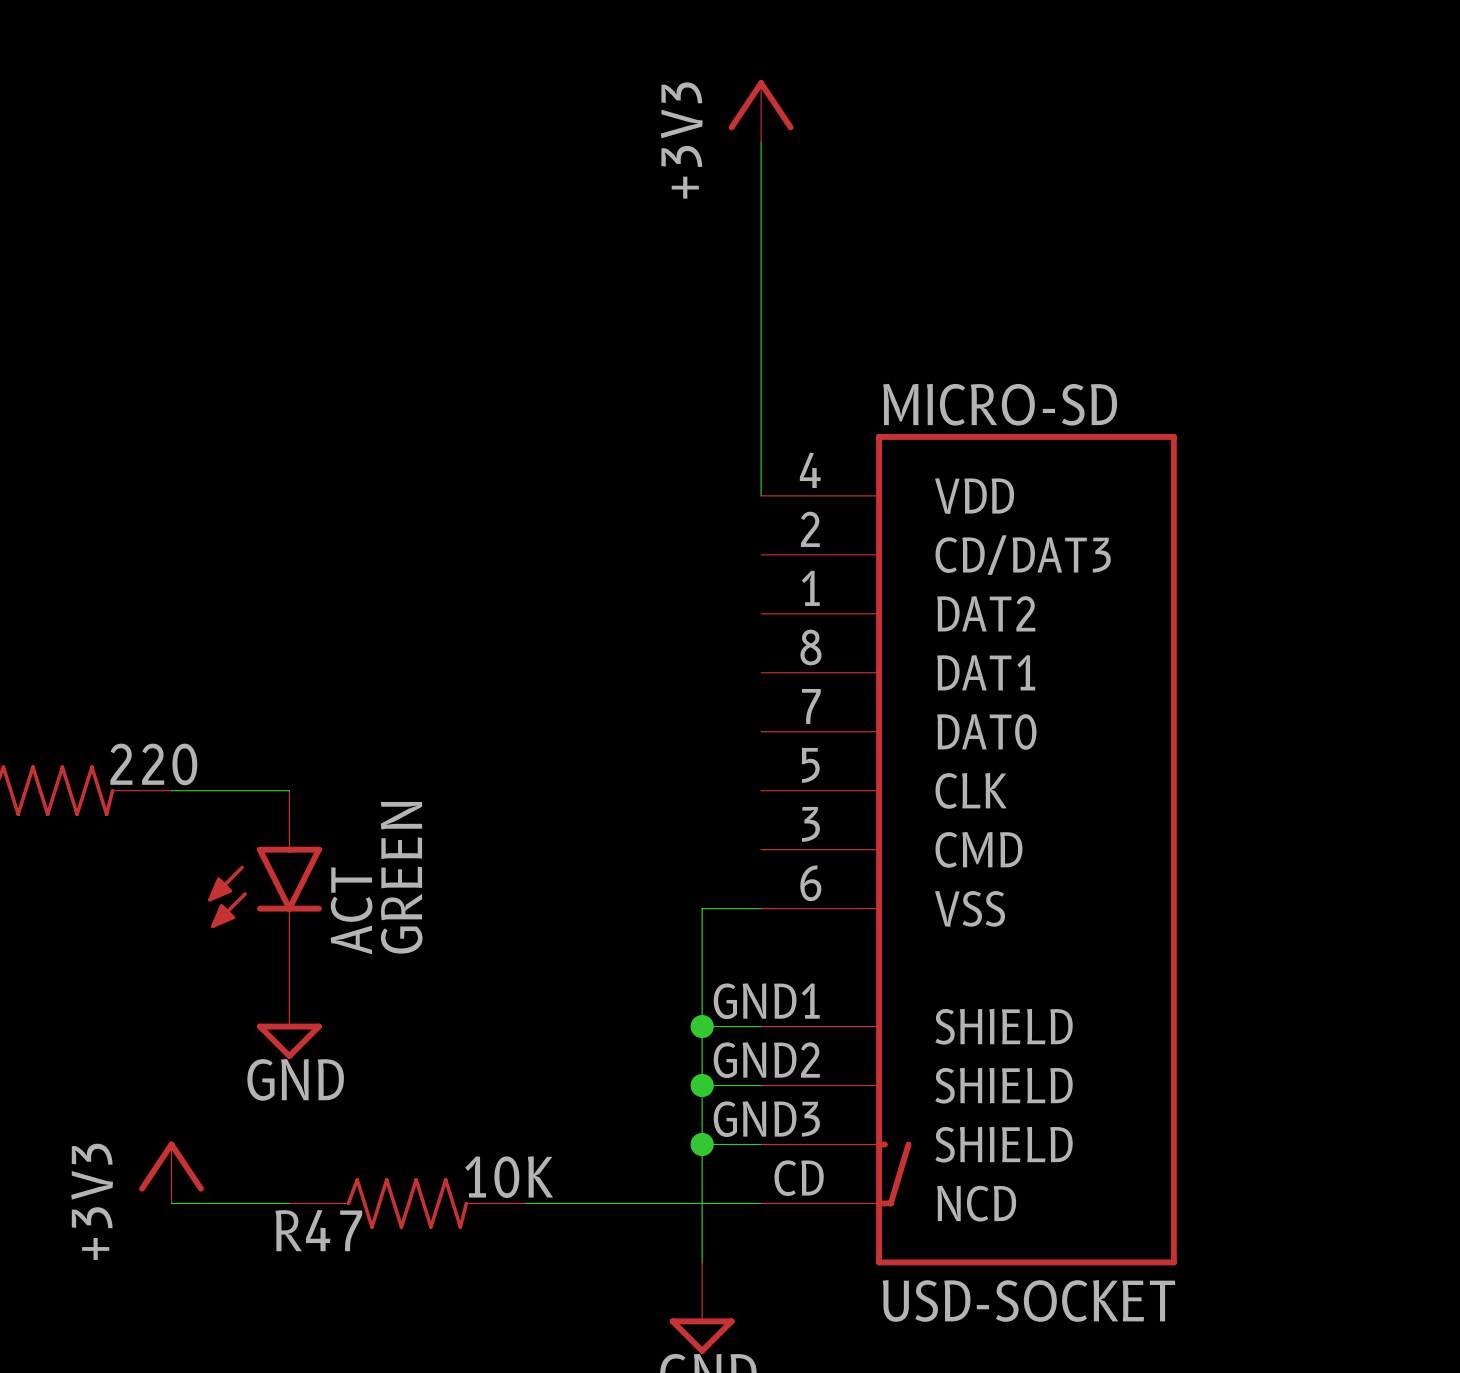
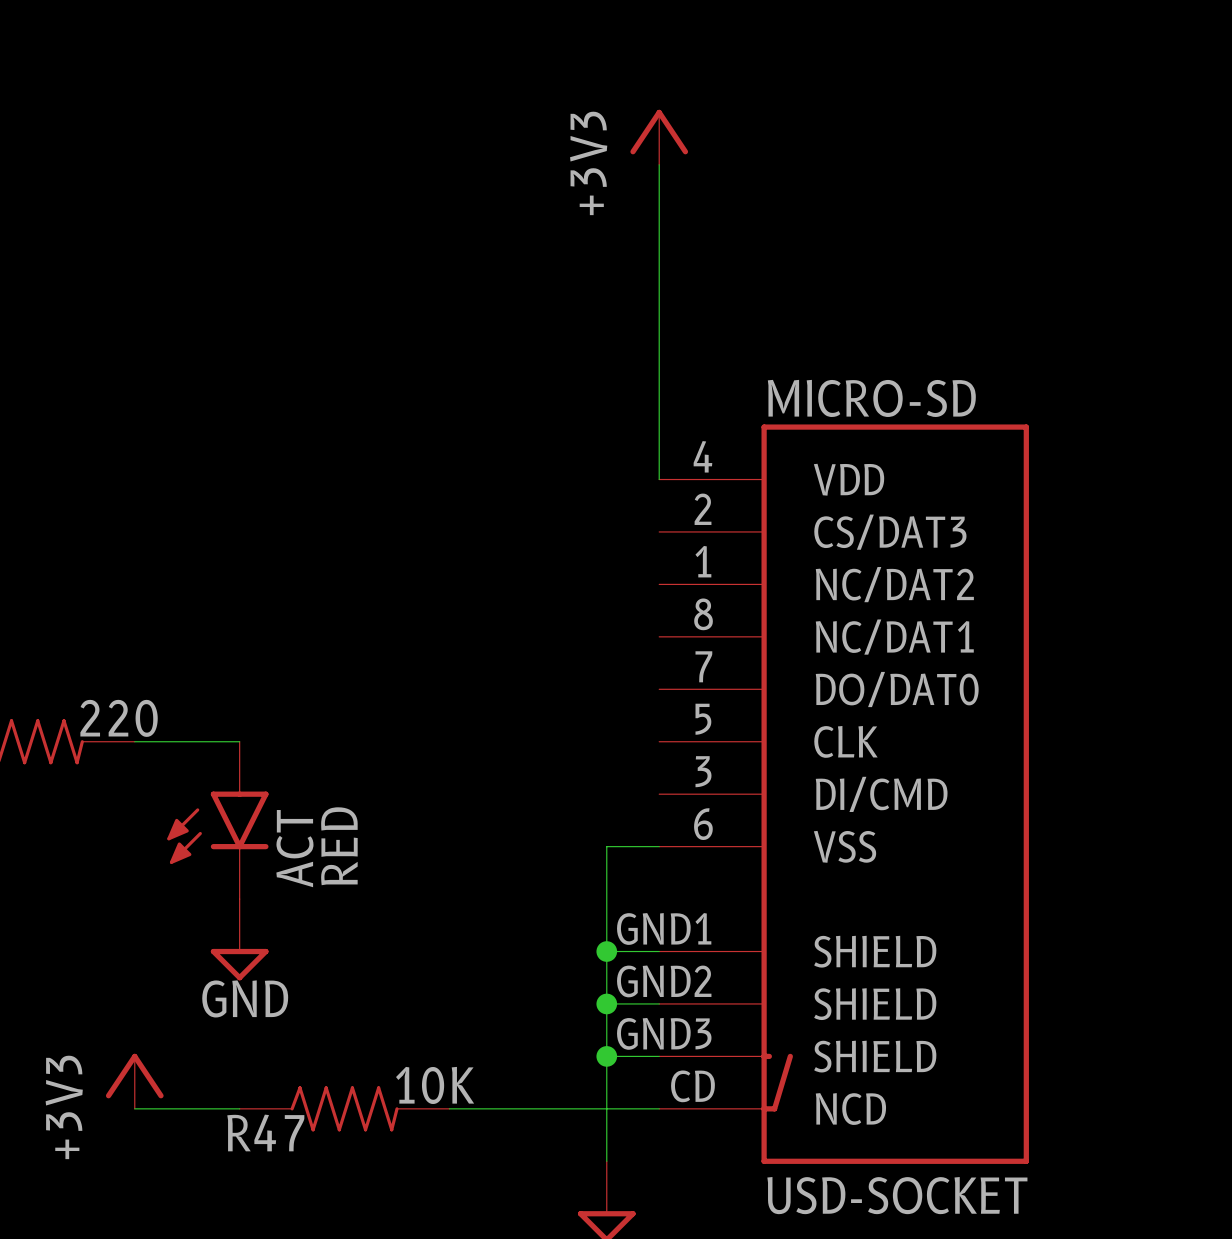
MICRO-SD pin name: CD/DAT3 (1023, 555) -> CS/DAT3 (890, 532)
MICRO-SD pin name: DAT2 (986, 613) -> NC/DAT2 (894, 584)
MICRO-SD pin name: DAT1 (986, 672) -> NC/DAT1 (894, 637)
MICRO-SD pin name: DAT0 (986, 731) -> DO/DAT0 (897, 689)
MICRO-SD pin name: CMD (978, 849) -> DI/CMD (881, 794)
ACT value: GREEN (401, 877) -> RED (339, 846)

